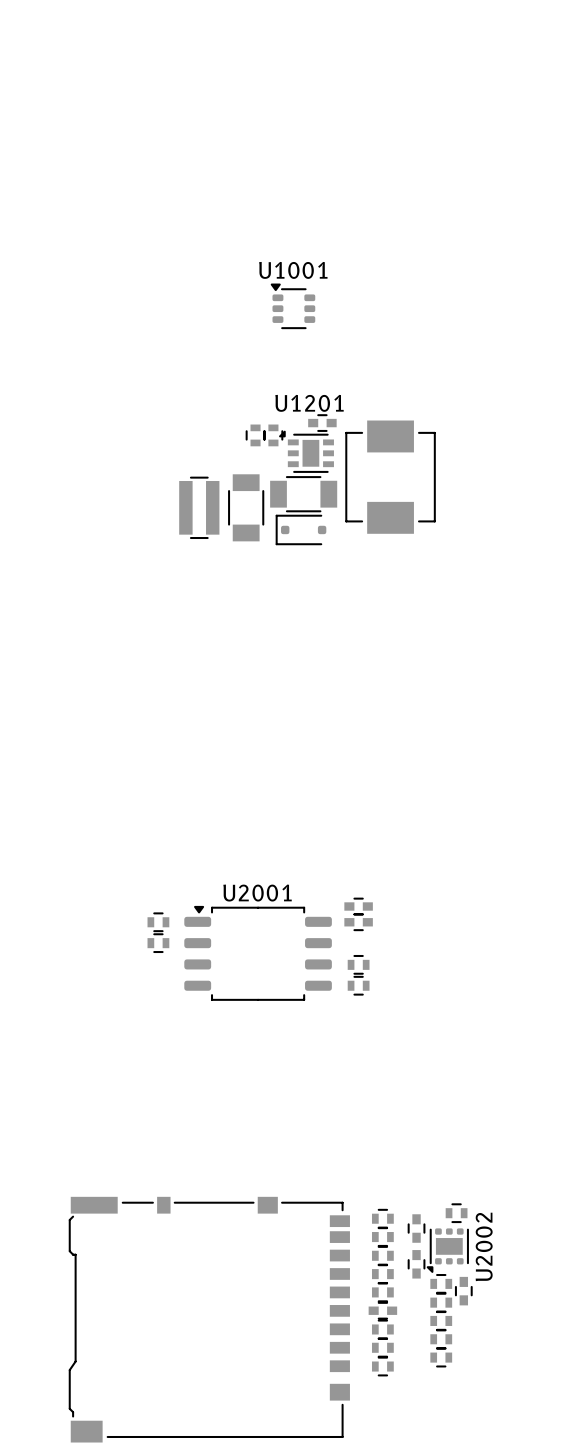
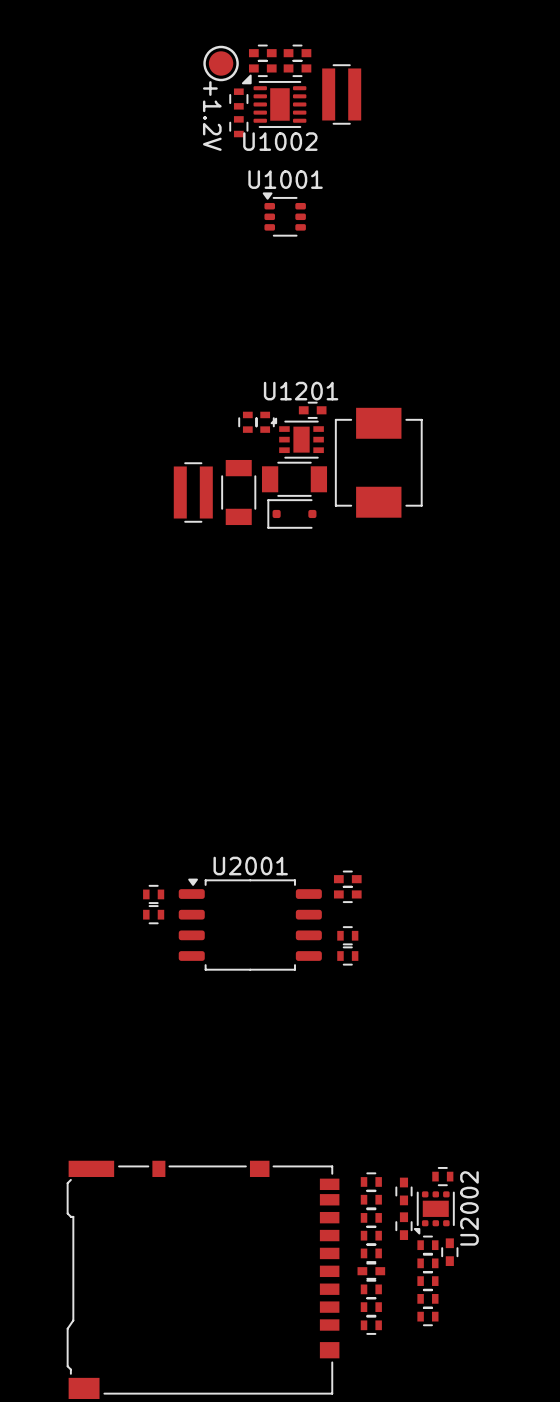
part: none -> (262, 53)
part: none -> (297, 53)
part: none -> (221, 63)
part: none -> (262, 68)
part: none -> (297, 68)
part: none -> (341, 94)
part: none -> (238, 99)
U1002: none -> (274, 101)
text: none -> +1.2V (212, 116)
part: none -> (238, 126)
U1001 position: (292, 306) -> (284, 214)

